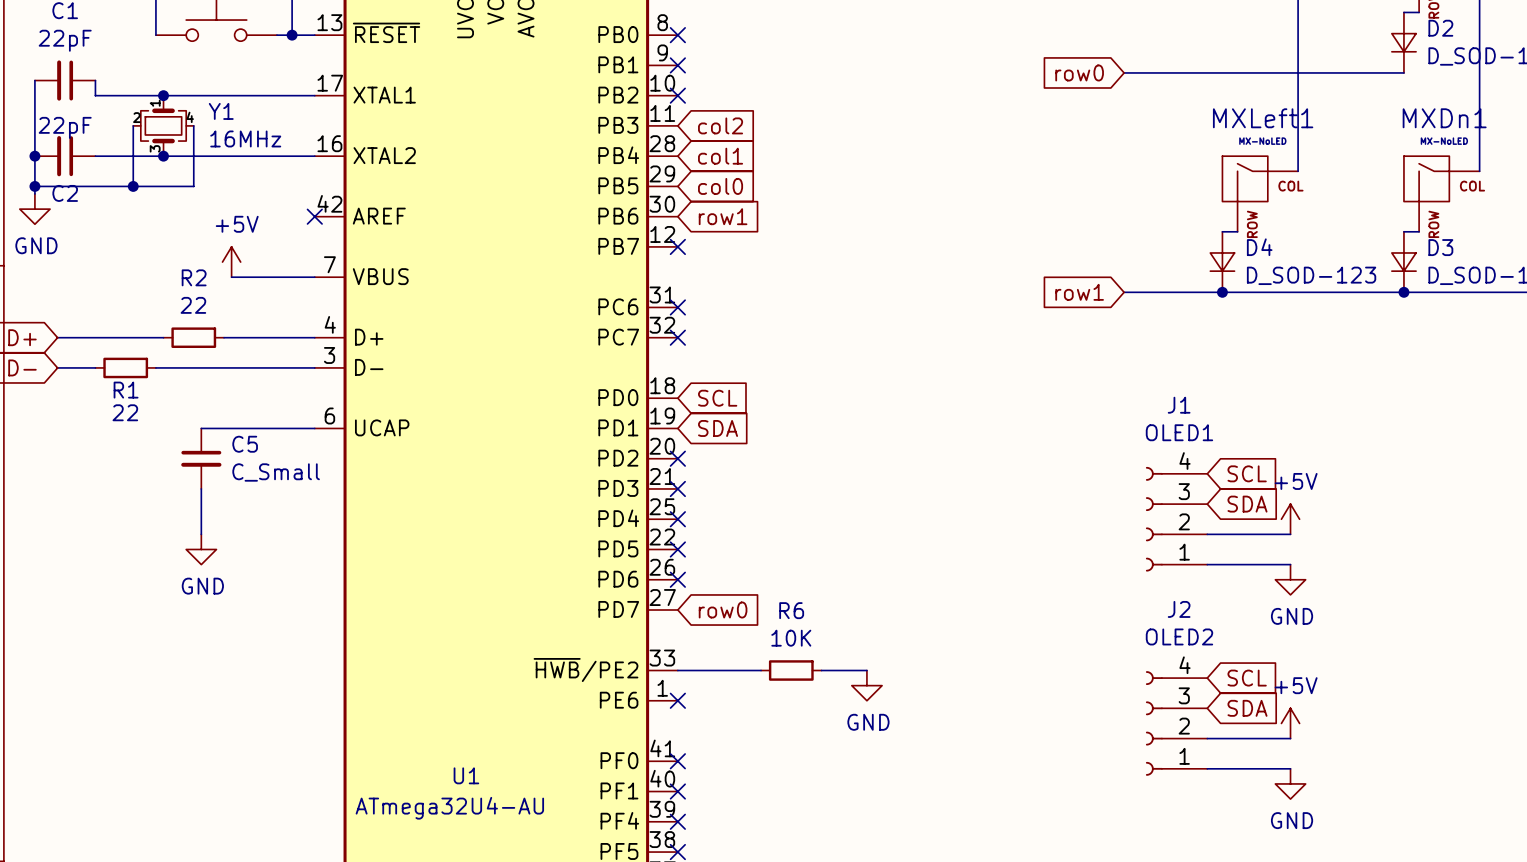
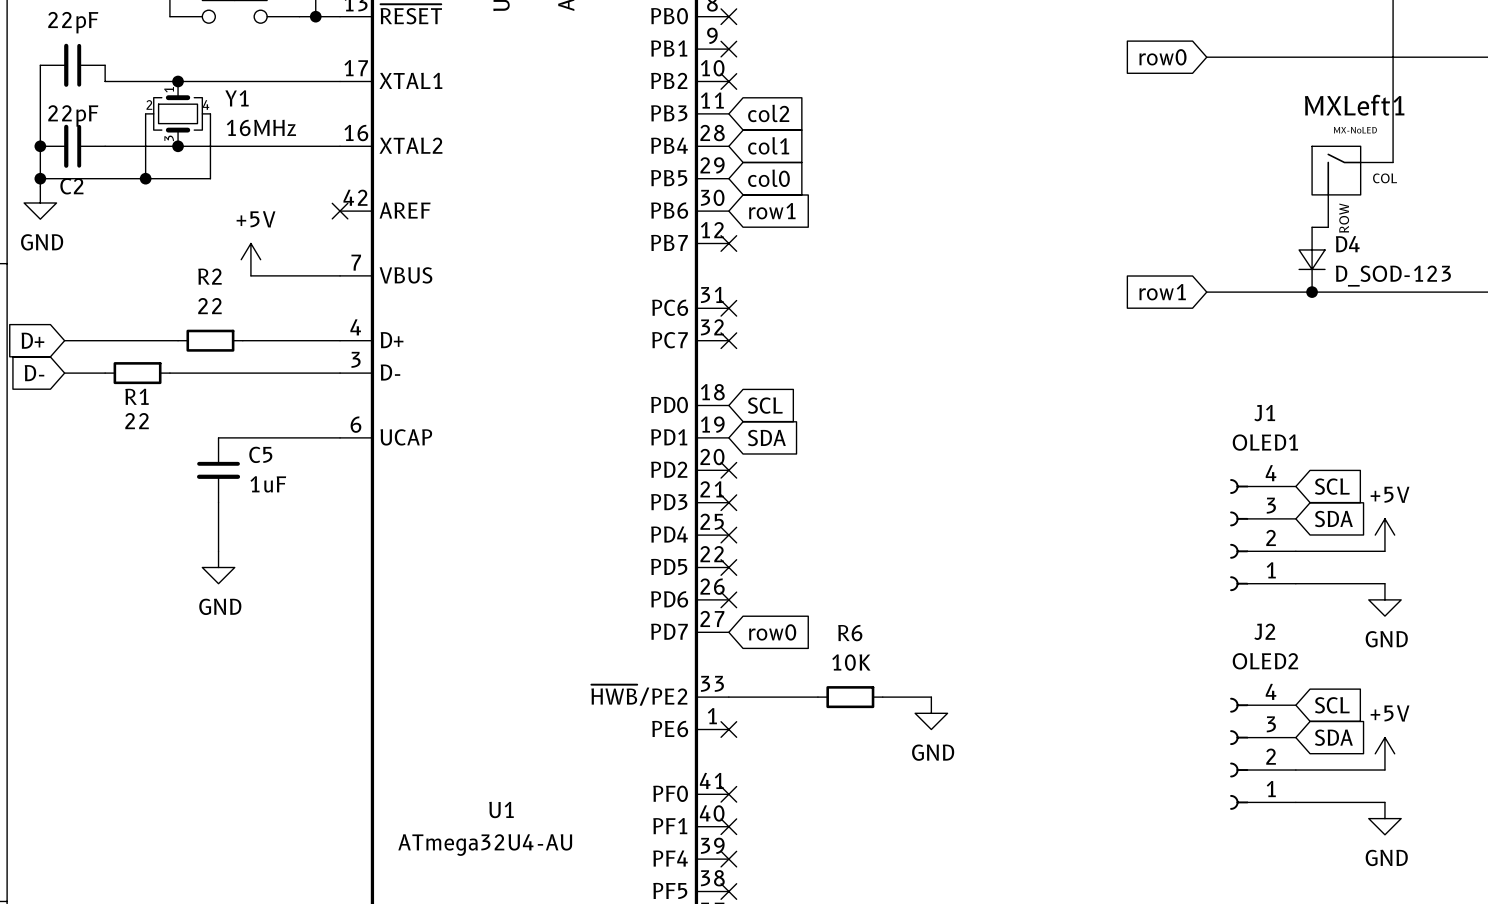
C5 value: C_Small (276, 472) -> 1uF (268, 484)

